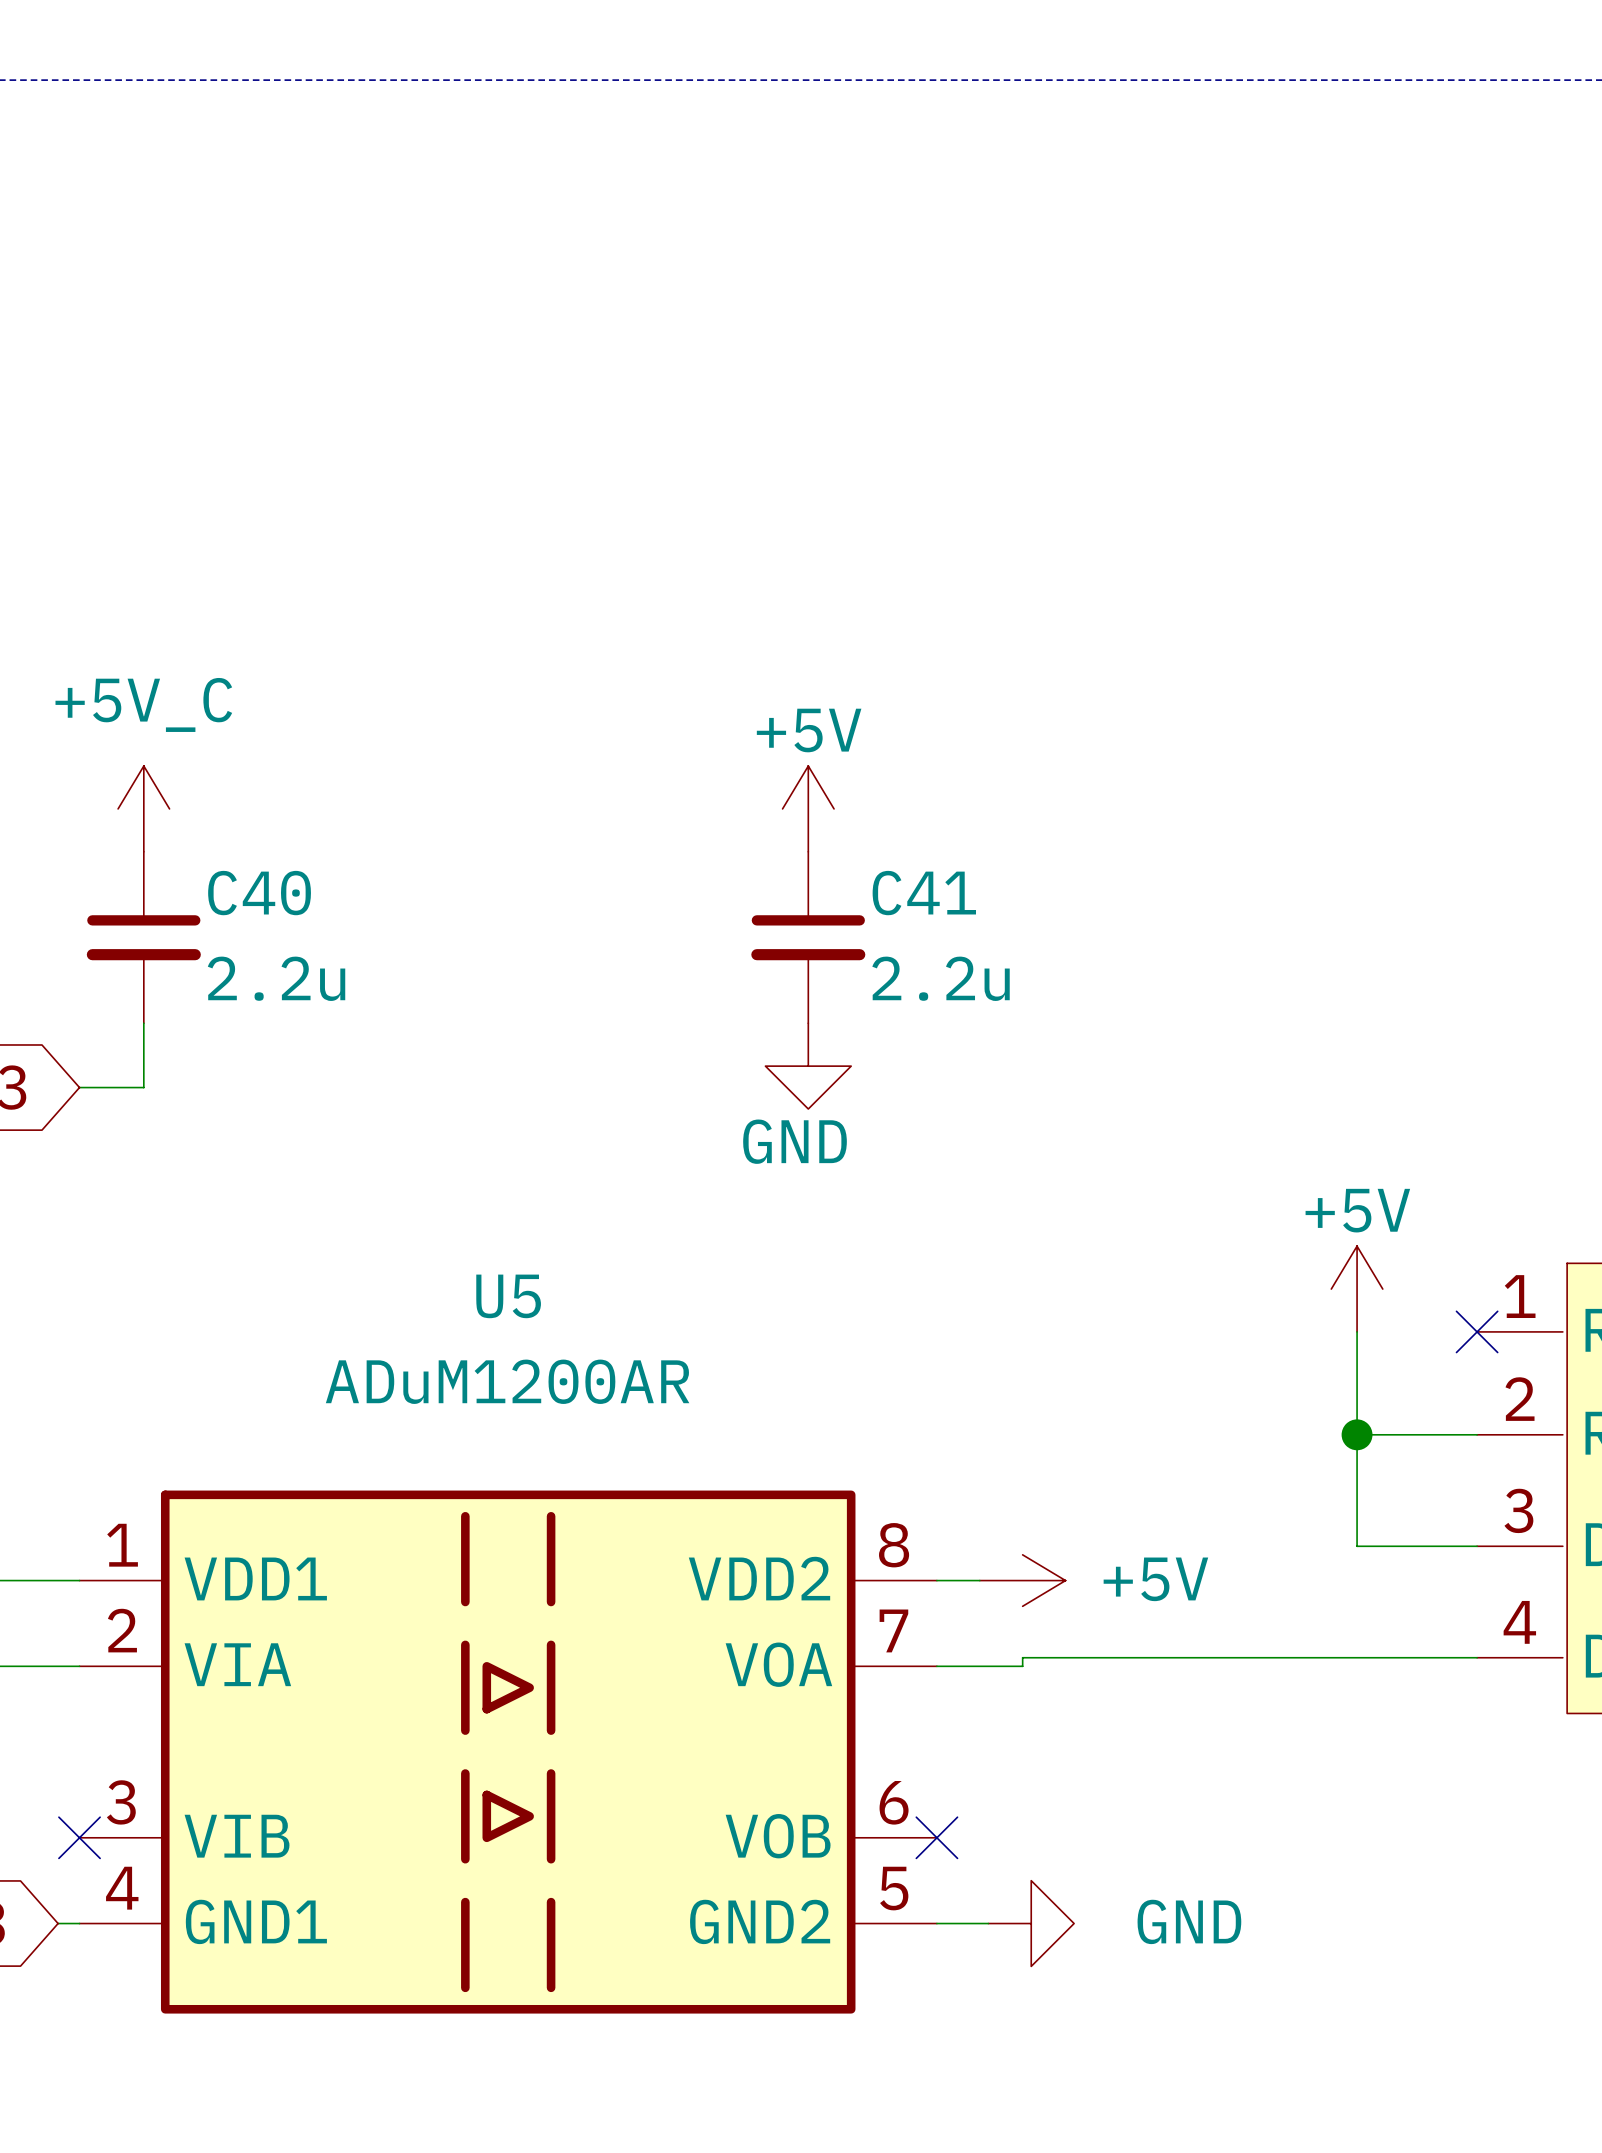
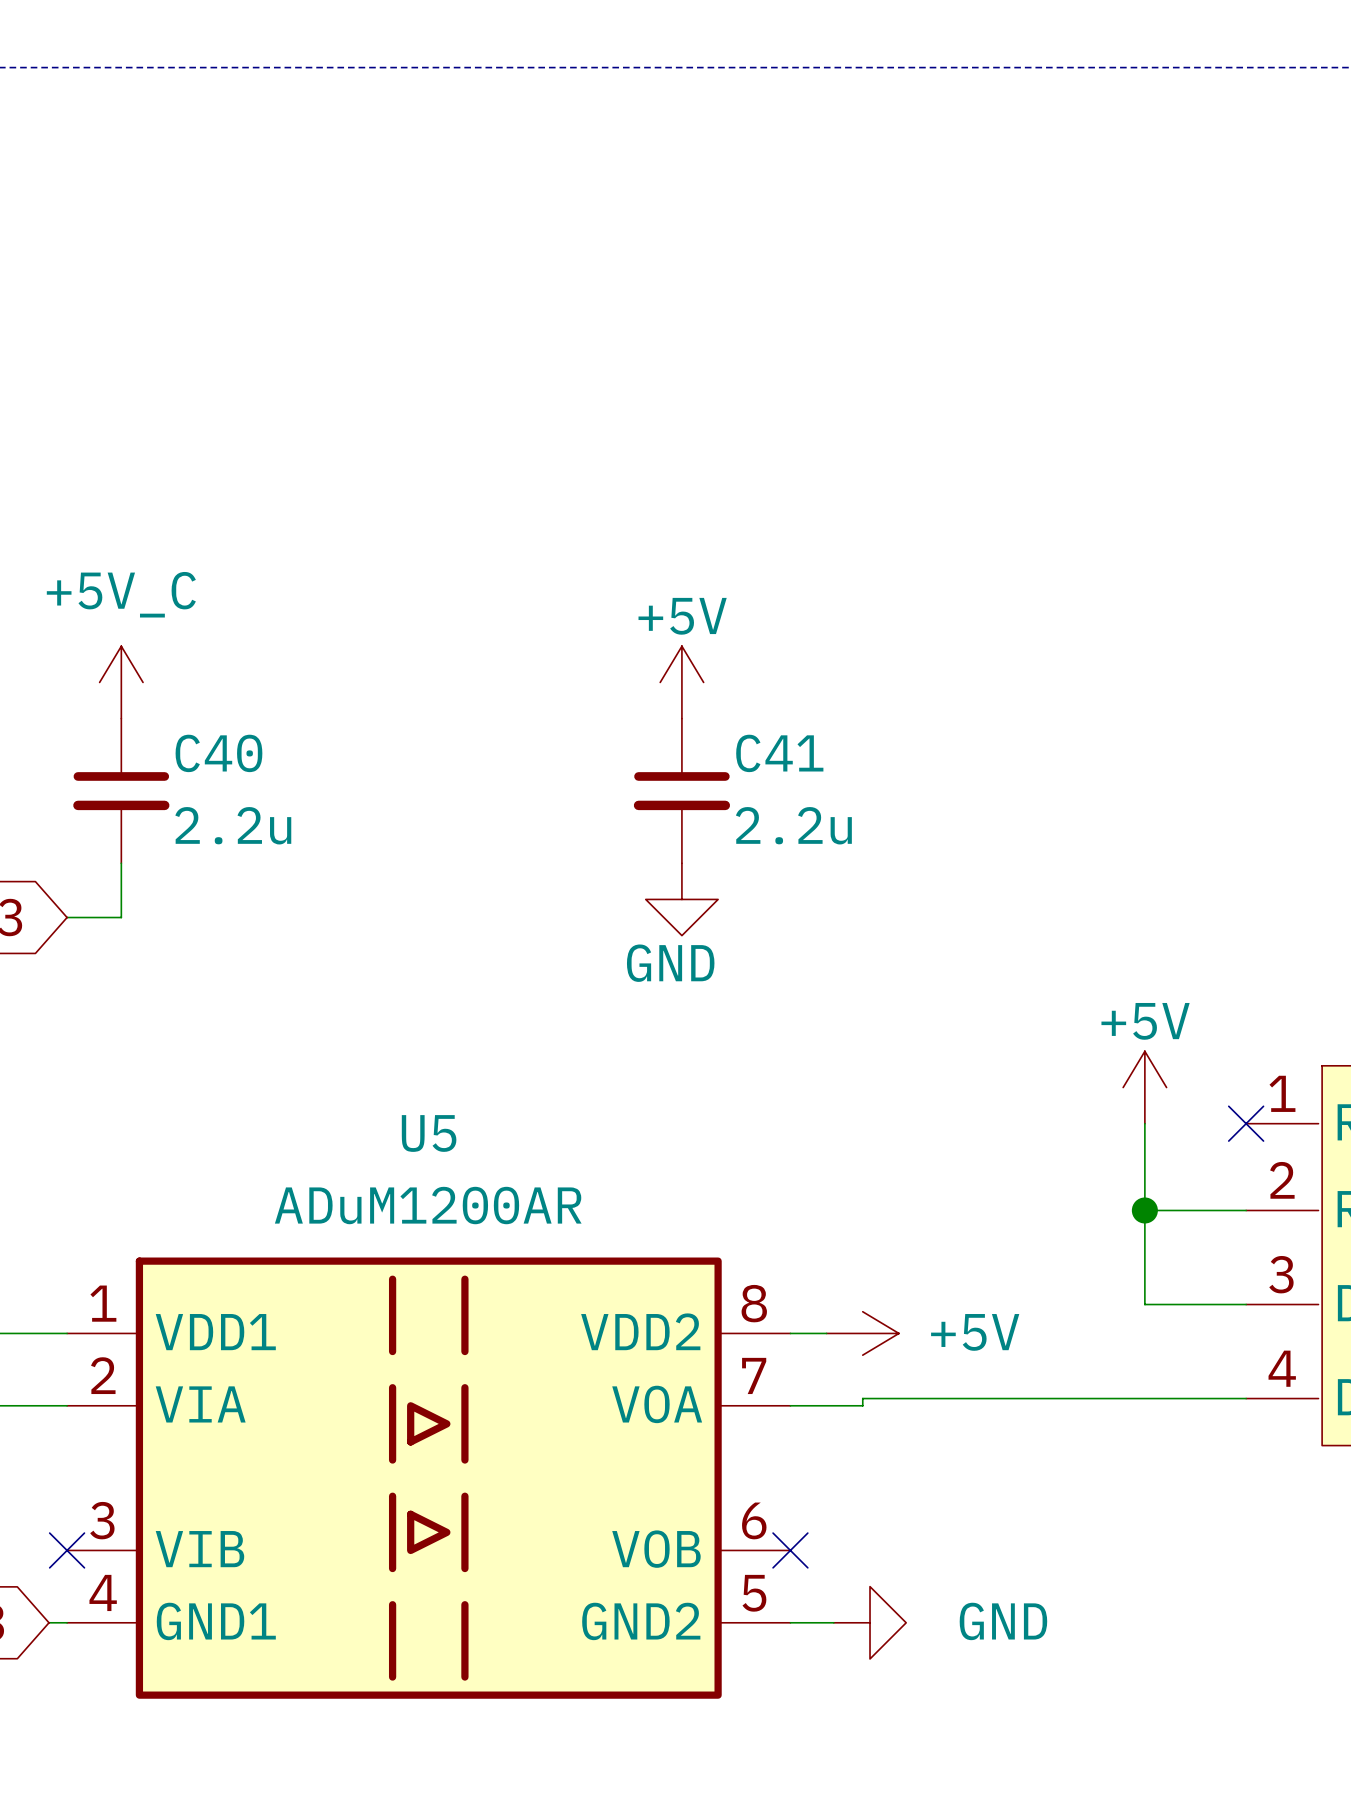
U5 name position: U5 (508, 1296) -> U5 (429, 1133)
U5 value position: ADuM1200AR (507, 1381) -> ADuM1200AR (428, 1205)

